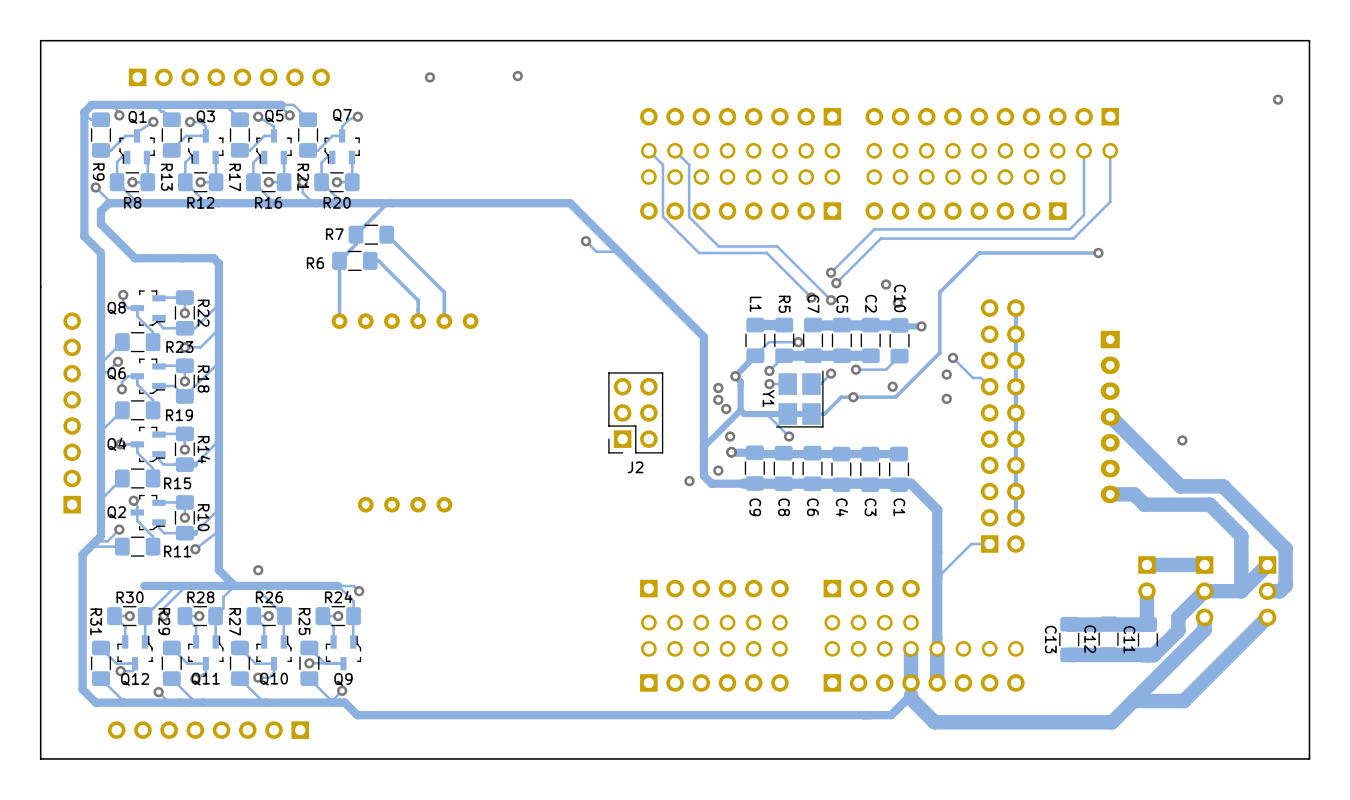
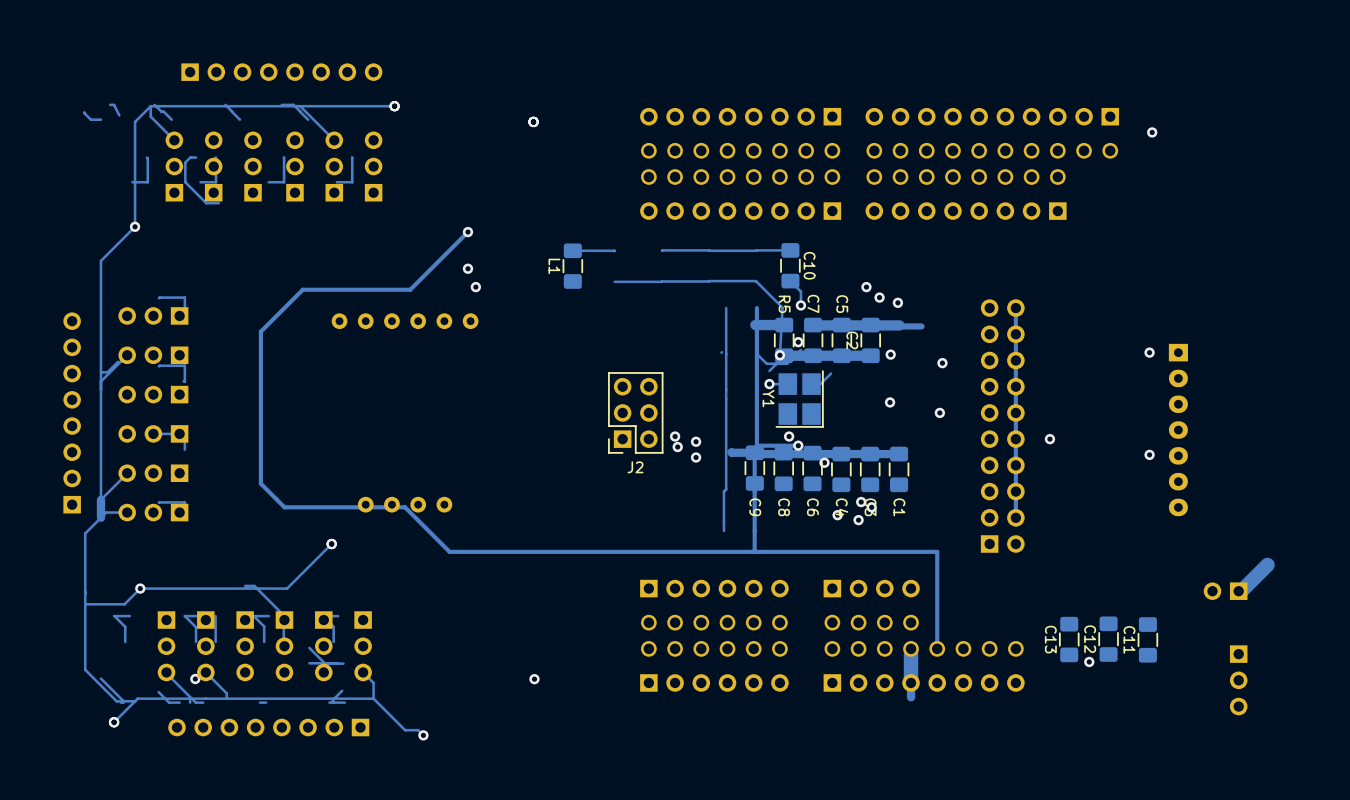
board edge: (1309, 40) (40, 40) (40, 758) (1309, 758) (1309, 40) -> none
via position: (517, 76) -> (533, 121)
part position: (229, 77) -> (281, 72)
via: (429, 77) -> none
via: (1278, 99) -> none
track: none -> (150, 106) (150, 116) (174, 140)
track: none -> (300, 106) (334, 140)
track: none -> (394, 106) (150, 106)
via: none -> (394, 106)
via: (119, 115) -> none
track: (289, 115) (281, 107) (281, 104) (91, 104) (84, 112) (84, 236) (100, 253) (100, 260) -> (150, 106) (135, 121) (135, 226) (100, 260)
via: (289, 115) -> none
track: (258, 116) (273, 126) (273, 135) (264, 135) (249, 150) (239, 150) -> none
via: (258, 116) -> none
via: (357, 116) -> none
track: (355, 119) (357, 116) (349, 119) (342, 126) (342, 135) (332, 135) (318, 150) (308, 150) -> none
track: (153, 121) (137, 132) (137, 135) (125, 135) (111, 150) (100, 150) -> none
via: (153, 121) -> none
via: (190, 121) -> none
track: (190, 125) (190, 121) (201, 121) (205, 126) (205, 135) (186, 135) (171, 150) -> none
via: none -> (1152, 132)
R9: (100, 135) -> none
R13: (171, 135) -> none
R17: (239, 135) -> none
R21: (308, 135) -> none
Q1: (137, 146) -> none
Q3: (205, 146) -> none
Q5: (273, 146) -> none
Q7: (342, 146) -> none
track: (648, 150) (662, 164) (662, 216) (699, 253) (766, 253) (811, 297) -> none
track: (675, 150) (689, 164) (689, 216) (718, 246) (777, 246) (831, 300) -> none
track: (1084, 150) (1084, 215) (1069, 229) (874, 229) (831, 272) -> none
track: (1110, 150) (1110, 201) (1073, 238) (880, 238) (836, 283) -> none
track: (127, 157) (121, 157) (117, 162) (117, 182) (138, 203) (140, 203) -> none
track: (264, 157) (258, 157) (253, 162) (253, 182) (273, 203) -> none
track: (332, 157) (326, 157) (321, 162) (321, 182) (342, 203) (344, 203) -> none
part: none -> (174, 166)
part: none -> (213, 166)
part: none -> (253, 166)
part: none -> (294, 166)
part: none -> (334, 166)
part: none -> (373, 166)
R8: (132, 182) -> none
via: (132, 182) -> none
R12: (200, 182) -> none
via: (200, 182) -> none
R16: (268, 182) -> none
via: (268, 182) -> none
track: (302, 182) (302, 192) (313, 203) (315, 203) -> none
via: (302, 182) -> none
R20: (336, 182) -> none
via: (336, 182) -> none
track: (95, 187) (111, 203) -> none
via: (95, 187) -> none
track: (391, 203) (387, 203) (356, 234) (356, 244) (339, 260) (339, 321) -> none
via: none -> (135, 226)
via: none -> (467, 232)
R7: (371, 234) -> none
track: (386, 234) (444, 292) (444, 321) -> none
track: (585, 241) (596, 251) (618, 251) -> none
via: (585, 241) -> none
track: none -> (572, 250) (614, 251)
track: none -> (790, 250) (661, 250)
track: (1098, 253) (979, 253) (939, 292) (939, 352) (895, 397) (841, 397) (824, 414) (744, 414) (740, 410) -> none
via: (1098, 253) -> none
track width: thick (100, 260) (100, 499) -> thin (100, 260) (100, 499)
R6: (354, 260) -> none
track: (370, 260) (378, 260) (418, 300) (418, 321) -> none
via: none -> (467, 268)
via: (831, 272) -> none
track: none -> (614, 281) (755, 281) (782, 307) (779, 355) (782, 352)
track: none -> (790, 281) (800, 291) (800, 305)
via: (836, 283) -> none
via: (886, 284) -> none
via: none -> (475, 287)
via: none -> (866, 287)
track: (123, 294) (123, 303) (128, 308) (137, 308) (137, 316) (153, 332) (153, 342) -> none
via: (123, 294) -> none
via position: (811, 297) -> (800, 305)
via: none -> (879, 297)
C10 name position: C10 (899, 298) -> C10 (809, 265)
via: (831, 300) -> none
C2 name position: C2 (871, 303) -> C2 (852, 340)
L1 name position: L1 (755, 304) -> L1 (554, 266)
track: (218, 305) (194, 328) (163, 328) (159, 323) (159, 317) -> none
Q8: (148, 308) -> none
track: none -> (726, 308) (726, 489) (723, 491) (723, 530)
track: none -> (756, 308) (756, 445)
R22: (184, 312) -> none
via: (184, 313) -> none
part: none -> (153, 315)
via: (921, 326) -> none
track: (218, 329) (200, 347) (184, 347) -> none
L1 position: (755, 340) -> (572, 266)
C10 position: (899, 340) -> (790, 265)
track: (122, 342) (100, 361) -> none
R23: (137, 342) -> none
track: (798, 342) (768, 342) (735, 376) (740, 381) (740, 410) -> none
via: (184, 347) -> none
track: none -> (800, 350) (787, 363) (766, 363) (756, 353)
track: none -> (721, 352) (721, 352)
via: none -> (1149, 352)
via: none -> (890, 354)
track: none -> (127, 355) (100, 381)
part: none -> (153, 355)
track: (899, 356) (885, 369) (855, 369) -> none
track: (952, 357) (973, 377) (980, 377) (989, 386) -> none
via: (952, 357) -> none
via: (118, 361) -> none
track: (218, 363) (184, 396) (174, 386) (159, 386) -> none
via: none -> (942, 363)
via: (855, 369) -> none
via position: (769, 370) -> (779, 355)
via: (831, 373) -> none
via: (946, 374) -> none
Q6: (148, 376) -> none
via: (735, 376) -> none
R18: (184, 381) -> none
via: (184, 381) -> none
via position: (892, 386) -> (890, 402)
via: (718, 388) -> none
track: (121, 389) (121, 382) (128, 376) (137, 376) (137, 384) (153, 400) (153, 410) -> none
via: (121, 389) -> none
part: none -> (153, 394)
via: (853, 397) -> none
via position: (946, 398) -> (939, 412)
via: (718, 399) -> none
via: (726, 409) -> none
track: (122, 410) (100, 431) -> none
R19: (137, 410) -> none
track: (740, 410) (703, 447) -> none
track: (769, 414) (769, 416) (789, 436) -> none
track: (1110, 416) (1180, 486) (1223, 486) (1285, 548) (1285, 585) (1279, 591) (1267, 591) -> none
part position: (1110, 416) -> (1178, 430)
part: none -> (153, 433)
via: none -> (675, 436)
via: (730, 436) -> none
via: none -> (1049, 439)
via position: (1182, 440) -> (1149, 454)
track: (218, 441) (194, 464) (163, 464) (159, 459) (159, 454) -> none
via: none -> (696, 441)
track: (120, 444) (137, 444) (137, 452) (153, 468) (153, 478) -> none
via: (120, 444) -> none
Q4: (148, 444) -> none
track: none -> (756, 445) (754, 447) (753, 551)
via: none -> (798, 445)
track: none -> (799, 445) (756, 445)
via: none -> (677, 447)
R14: (184, 449) -> none
via: (184, 449) -> none
via: (731, 452) -> none
via: none -> (696, 457)
via: none -> (824, 462)
via: (718, 470) -> none
part: none -> (153, 473)
R15: (137, 478) -> none
via: (689, 481) -> none
track: (1110, 494) (1134, 494) (1144, 504) (1209, 504) (1241, 536) (1241, 591) (1204, 591) (1178, 617) (1178, 630) (1154, 654) (1069, 654) -> none
via: (133, 500) -> none
via: none -> (861, 502)
track: (133, 503) (133, 500) (137, 506) (137, 520) (153, 536) (153, 546) -> none
via: none -> (871, 507)
track: (218, 509) (194, 533) (164, 533) (159, 528) (159, 522) -> none
track: none -> (127, 512) (106, 512) (85, 533) (85, 669) (116, 701) (135, 701)
Q2: (148, 512) -> none
part: none -> (153, 512)
via: none -> (837, 515)
track: (100, 517) (100, 536) (82, 554) (82, 689) (95, 702) (344, 702) (357, 715) (891, 715) (911, 695) (911, 698) (934, 722) (1112, 722) (1204, 629) (1204, 617) -> none
R10: (184, 517) -> none
via: (184, 517) -> none
via: none -> (858, 520)
track: (218, 528) (218, 530) (195, 549) -> none
track: (119, 529) (107, 541) (95, 541) -> none
via: (119, 529) -> none
track: none -> (331, 544) (287, 588) (140, 588) (124, 604) (85, 604)
via: none -> (331, 544)
track: (989, 544) (971, 544) (937, 578) -> none
track: (122, 546) (89, 547) -> none
R11: (137, 546) -> none
via: (195, 549) -> none
track: (937, 551) (937, 509) (911, 483) (711, 483) (703, 475) (703, 336) (570, 203) (108, 203) (100, 211) (100, 224) (135, 258) (213, 258) (218, 263) (218, 570) (234, 585) (223, 597) (223, 608) (215, 616) -> (937, 551) (449, 551) (405, 507) (284, 507) (260, 483) (260, 331) (302, 289) (410, 289) (467, 232)
track width: thick (937, 551) (937, 648) -> thin (937, 551) (937, 648)
track: (1204, 564) (1146, 564) -> none
via: (258, 570) -> none
part rotation: 0° (1146, 578) -> 90° clockwise (1225, 591)
part position: (1146, 578) -> (1225, 591)
track: (144, 585) (338, 585) (353, 601) (353, 641) -> none
track: (175, 585) (145, 616) (144, 641) -> none
track: (186, 585) (163, 608) (163, 616) -> none
track: (333, 586) (354, 586) (359, 591) -> none
via: none -> (140, 588)
via: (359, 591) -> none
track: (1146, 591) (1147, 624) (1069, 624) -> none
part: (1204, 591) -> none
part: (1267, 591) -> none
R30: (129, 616) -> none
via: (129, 616) -> none
via: (163, 616) -> none
via: (199, 616) -> none
R28: (200, 616) -> none
via: (268, 616) -> none
R26: (269, 616) -> none
R24: (338, 616) -> none
via: (338, 616) -> none
track: (1267, 617) (1183, 701) (1133, 701) -> none
part: none -> (166, 646)
part: none -> (205, 646)
part: none -> (245, 646)
part: none -> (284, 646)
part: none -> (323, 646)
part: none -> (363, 646)
track: (100, 647) (116, 663) (135, 663) (135, 668) (132, 671) (120, 671) -> none
track: (171, 647) (187, 663) (205, 663) (205, 672) (195, 679) -> none
track: (239, 647) (255, 663) (273, 663) (273, 672) (269, 677) (258, 677) -> none
track: (937, 648) (937, 682) -> none
Q12: (135, 652) -> none
Q11: (205, 652) -> none
Q10: (273, 652) -> none
Q9: (343, 652) -> none
via: none -> (1089, 661)
R31: (100, 663) -> none
R29: (171, 663) -> none
R27: (239, 663) -> none
R25: (309, 663) -> none
via: (309, 663) -> none
via: (120, 671) -> none
track: none -> (205, 672) (226, 693) (226, 698)
track: none -> (363, 672) (373, 682) (373, 698)
via: (258, 677) -> none
track: (239, 678) (263, 702) -> none
track: (309, 678) (333, 702) -> none
via: none -> (534, 679)
part: none -> (1238, 680)
via: (342, 690) -> none
via: (158, 692) -> none
track: none -> (373, 698) (405, 730) (418, 730) (423, 735)
track: none -> (373, 698) (137, 698) (114, 722)
via: none -> (114, 722)
part position: (208, 730) -> (268, 727)
via: none -> (423, 735)

